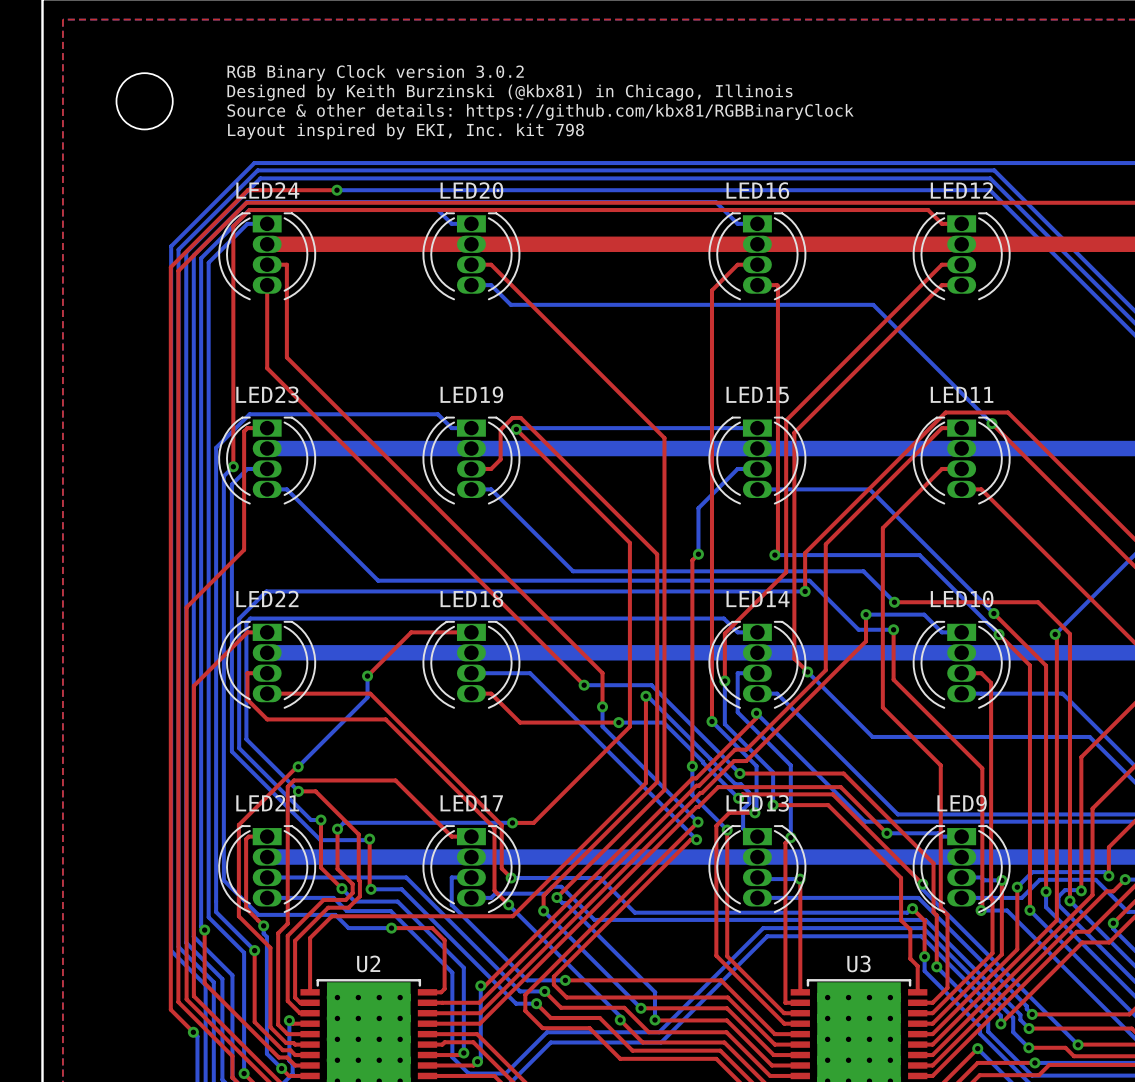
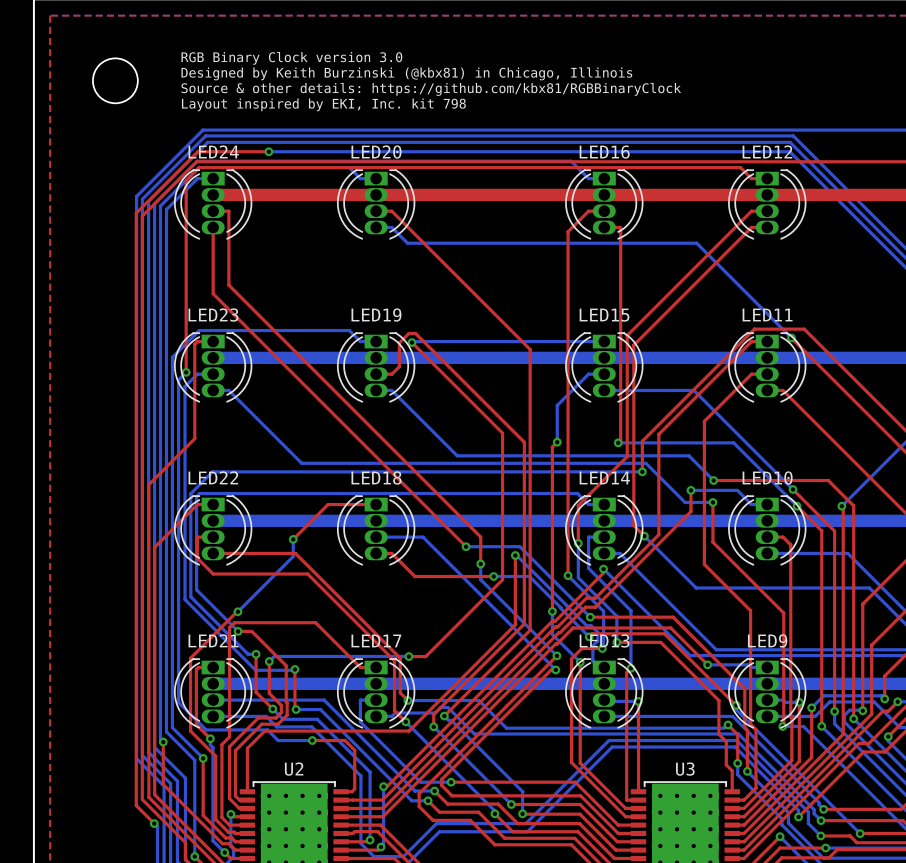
text: RGB Binary Clock version 3.0.2 (375, 73) -> RGB Binary Clock version 3.0 (291, 58)

